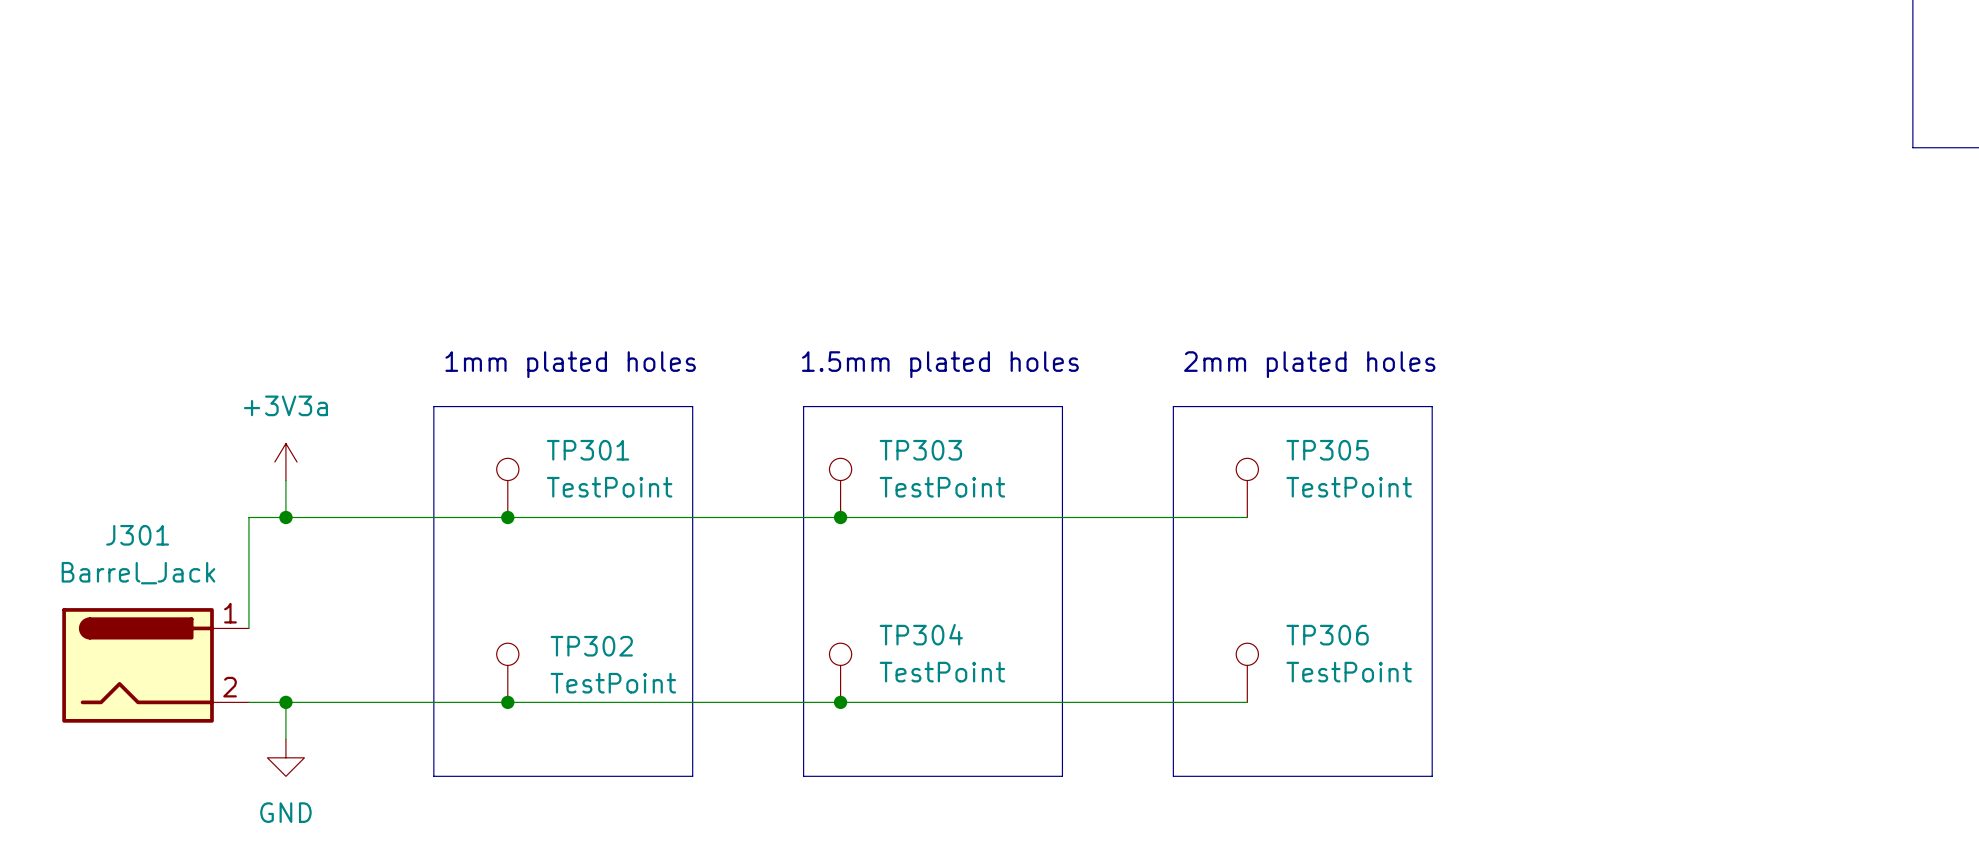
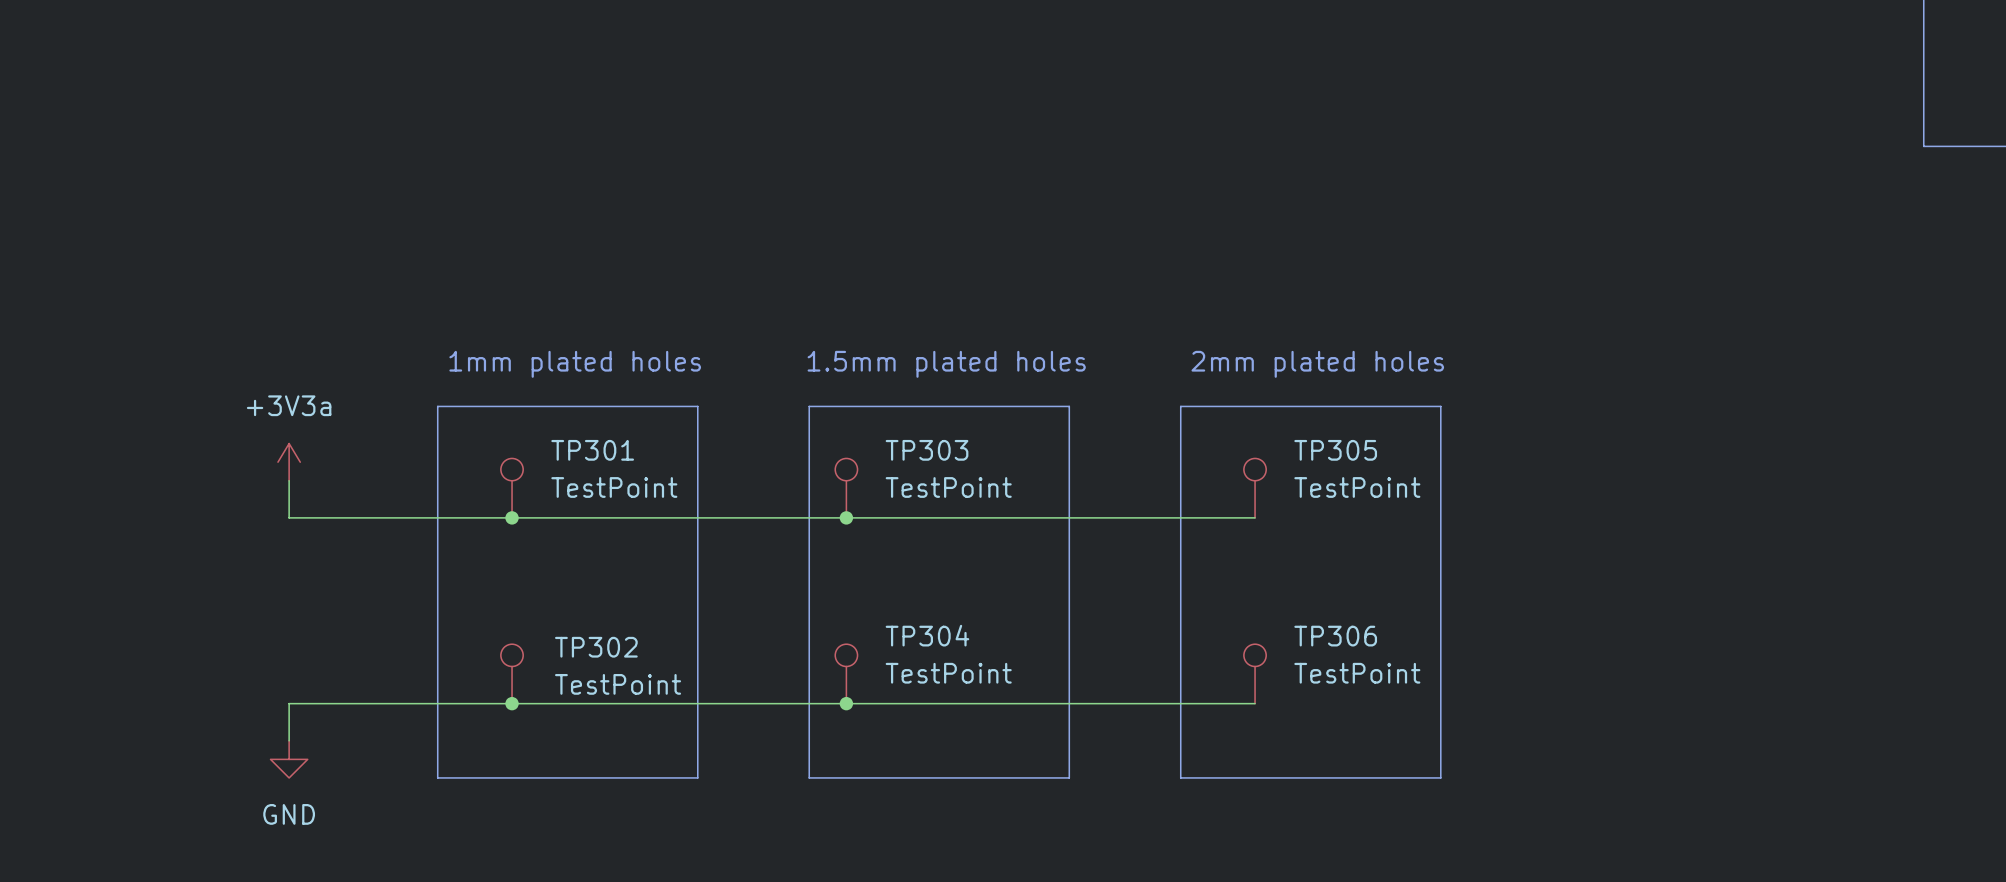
wire: (285, 517) (248, 517) (248, 628) -> none
junction: (285, 517) -> none
J301: Barrel_Jack (155, 665) -> none
wire: (248, 702) (285, 702) -> none
junction: (285, 702) -> none

